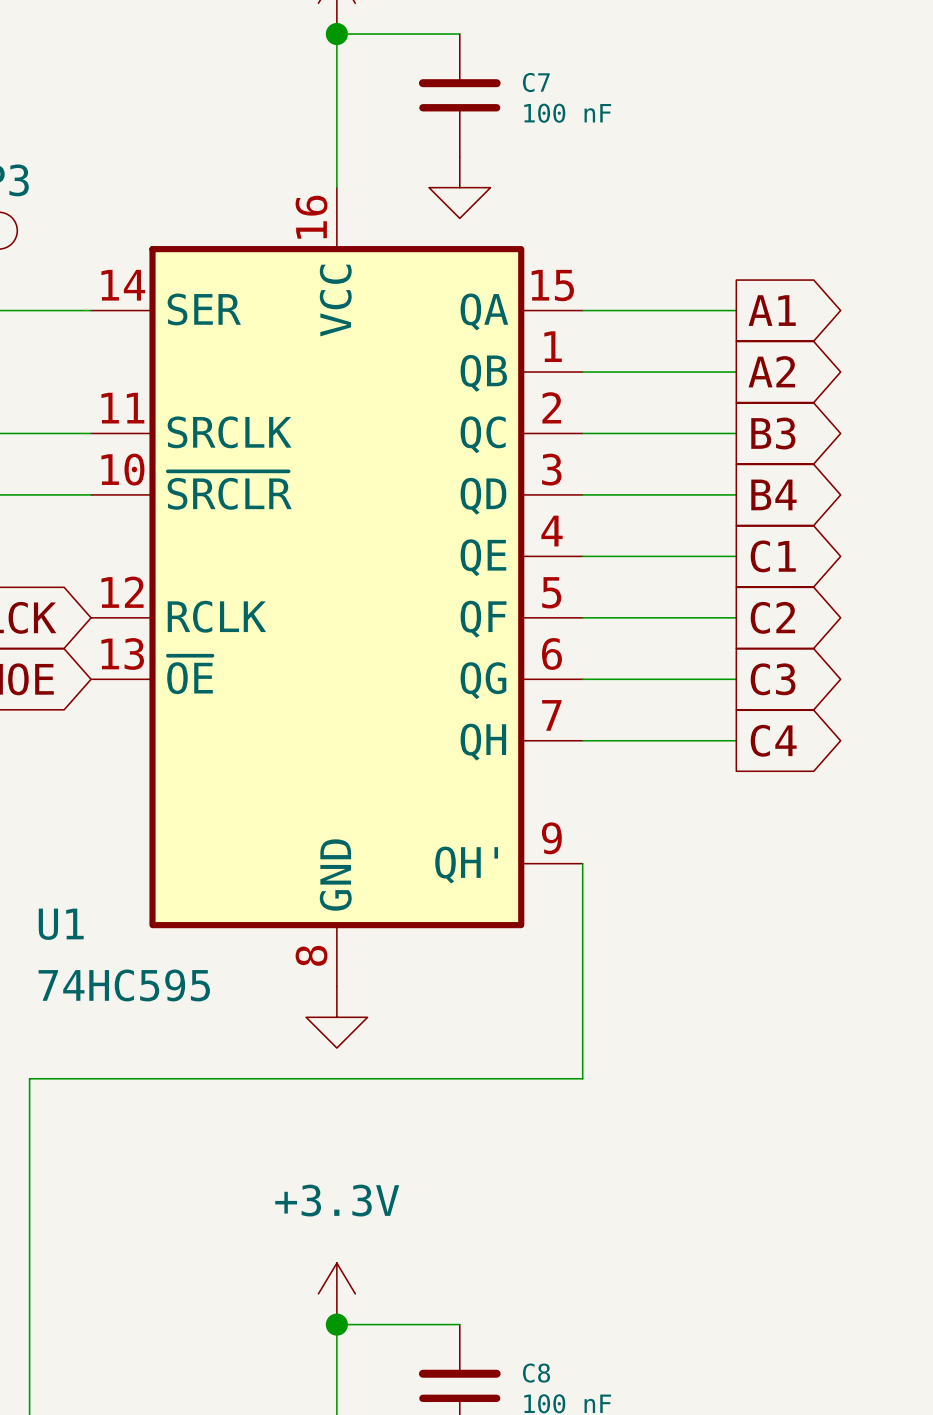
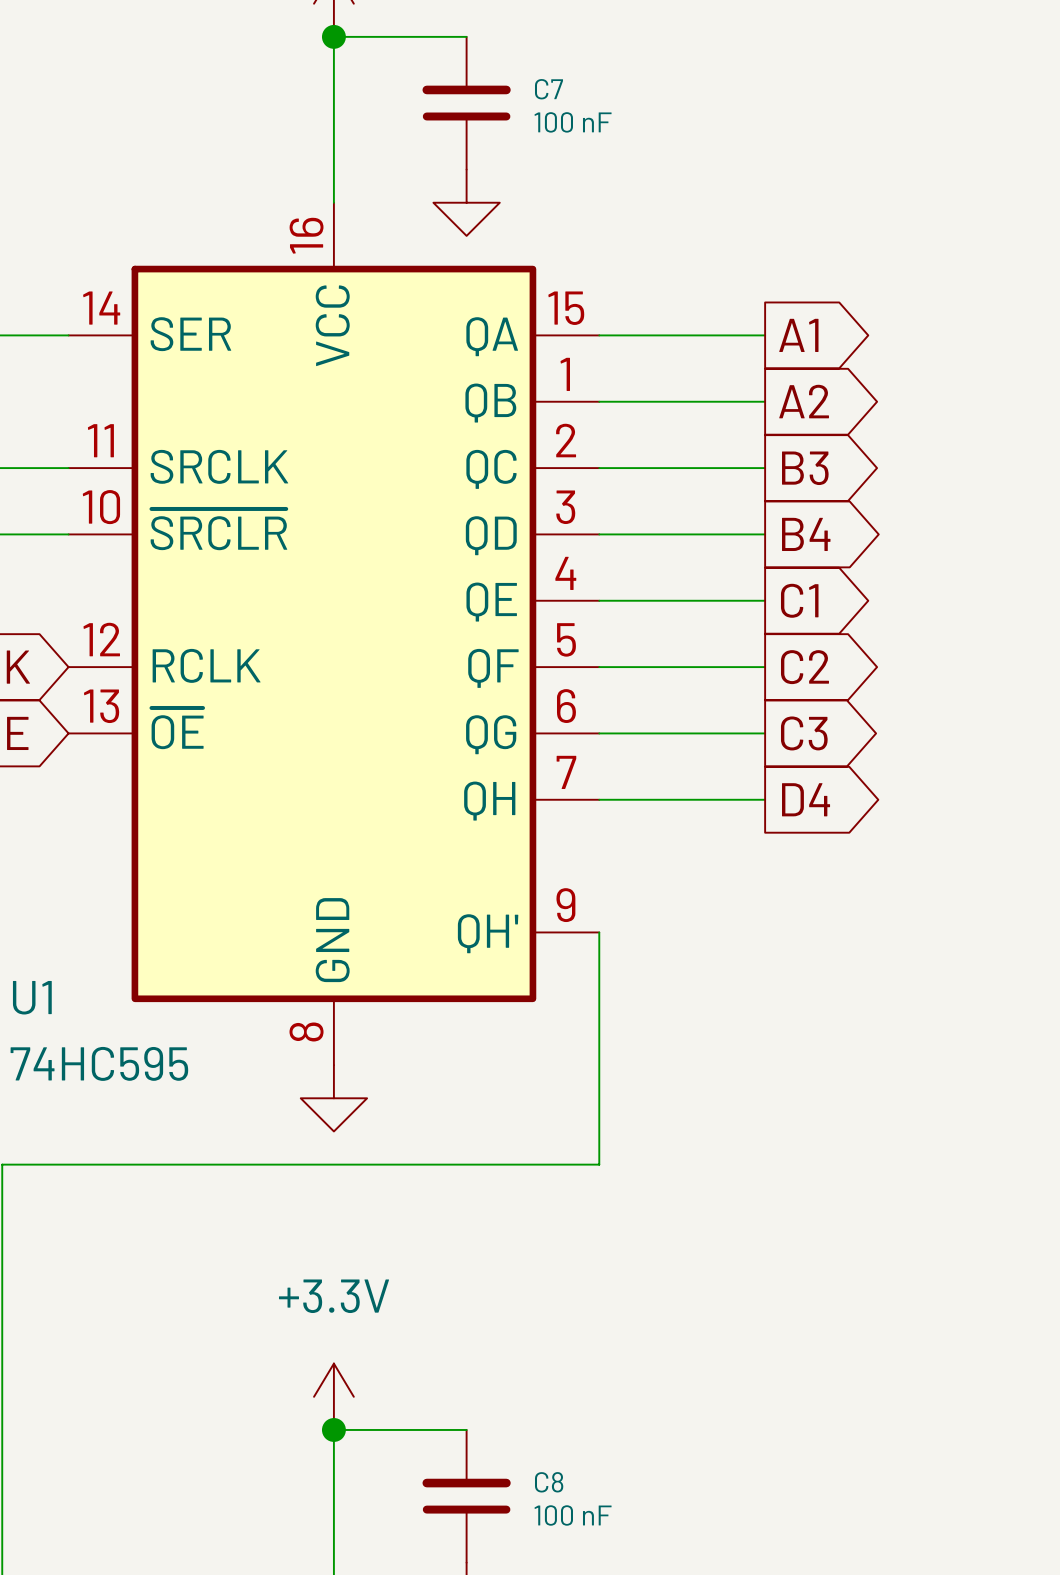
global label: C4 (773, 740) -> D4 (806, 799)

